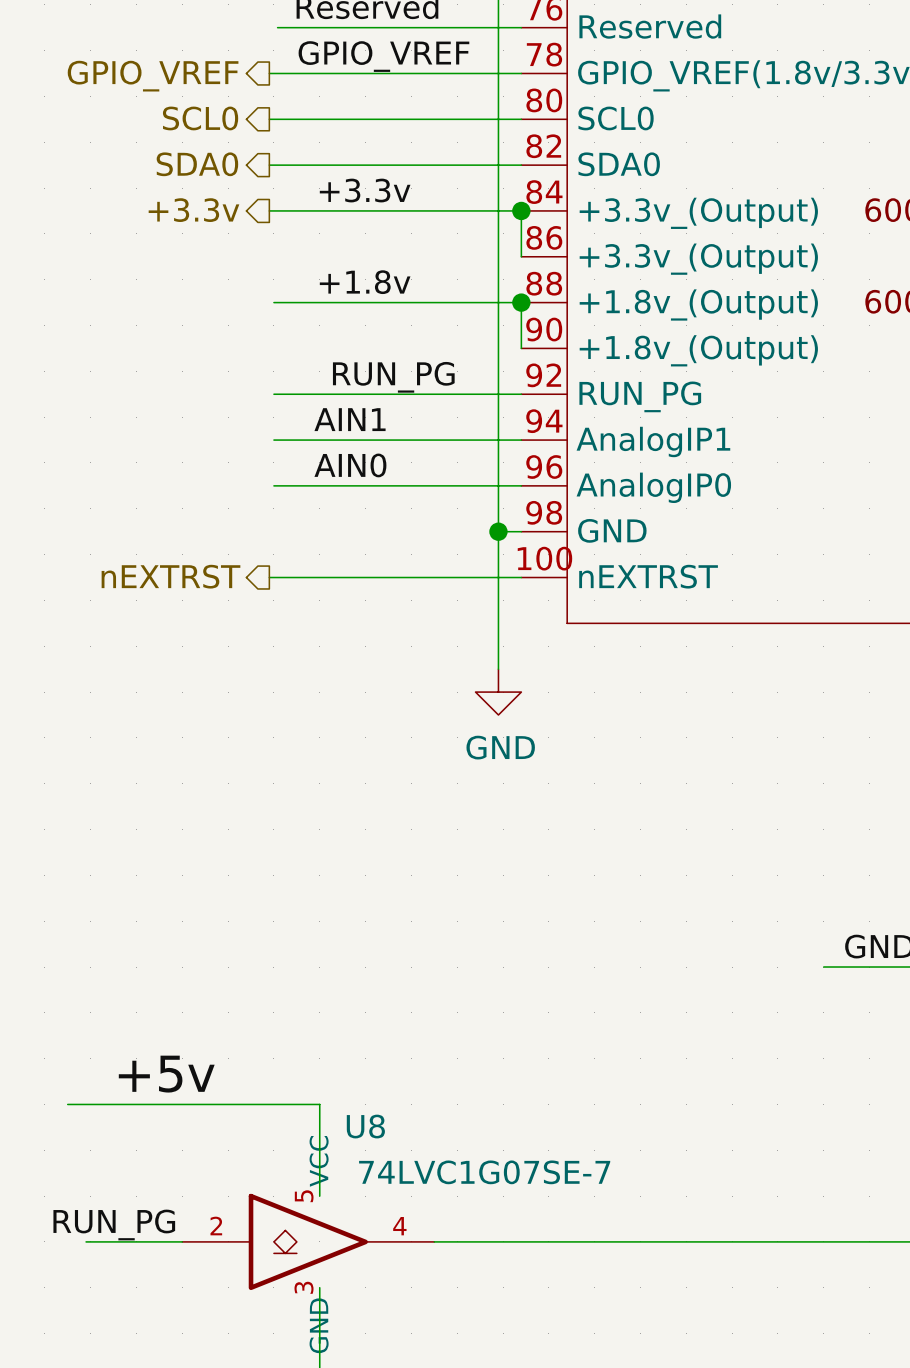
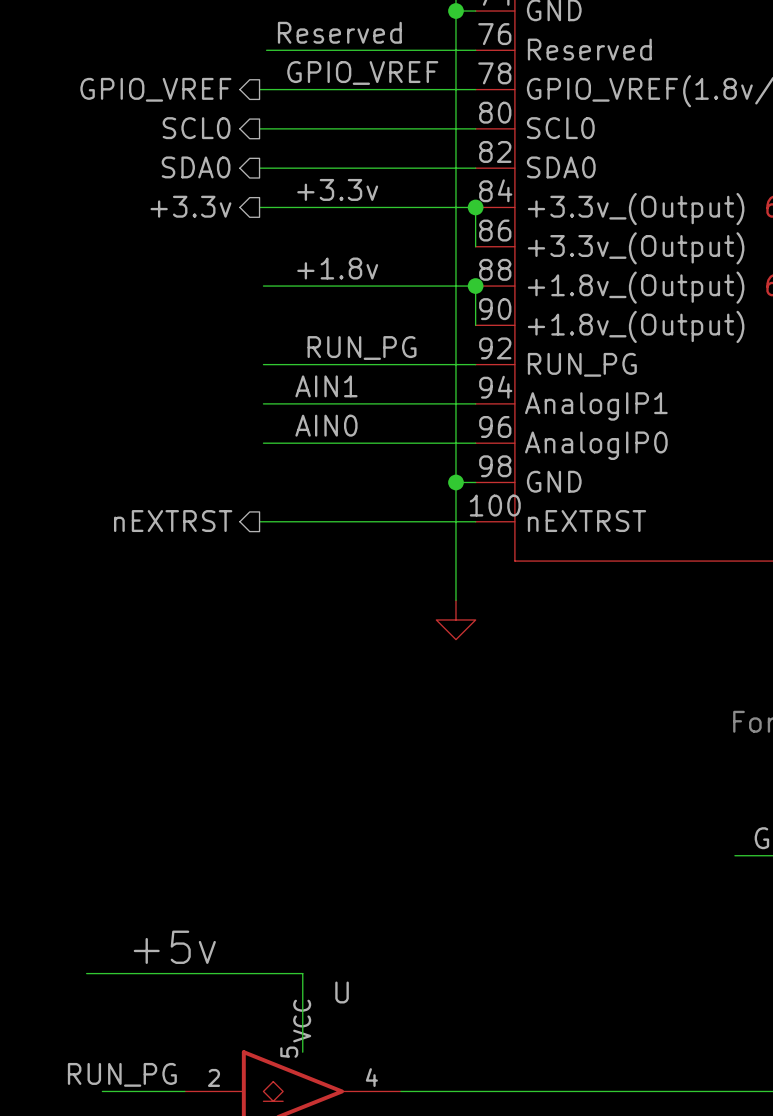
power symbol text: GND (500, 747) -> none
U8 name: U8 (365, 1126) -> U (342, 992)
U8 value: 74LVC1G07SE-7 (484, 1172) -> none

